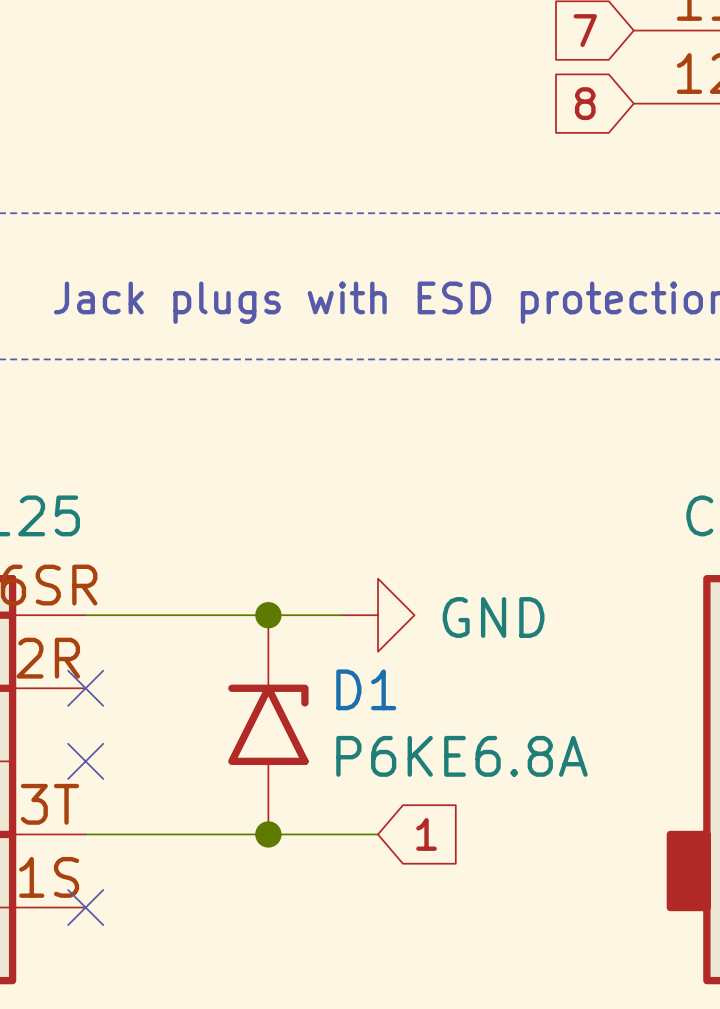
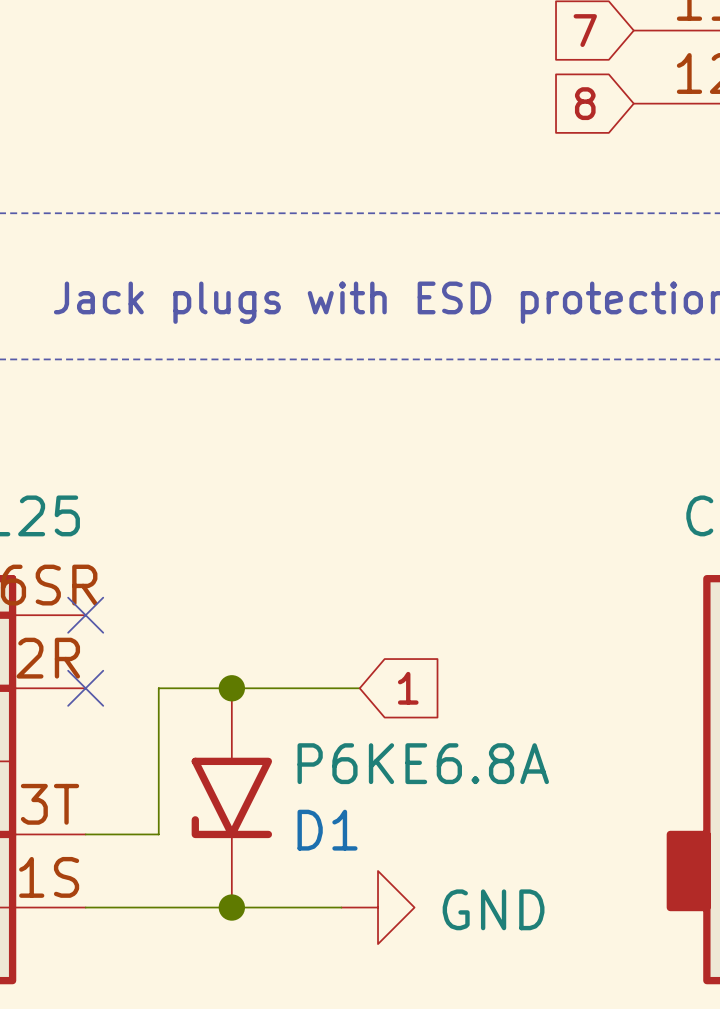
wire: (85, 615) (341, 615) -> (85, 907) (341, 907)
no-connect mark: none -> (85, 615)
junction: (268, 615) -> none
power symbol position: GND (378, 615) -> GND (378, 907)
junction: none -> (231, 688)
D1 name position: D1 (366, 689) -> D1 (327, 830)
D1 rotation: 0° (268, 724) -> 180° (231, 797)
D1 value position: P6KE6.8A (461, 756) -> P6KE6.8A (423, 763)
no-connect mark: (85, 761) -> none
wire: (158, 834) (378, 834) -> (158, 834) (158, 688) (359, 688)
junction: (268, 834) -> none
global label position: 1 (426, 834) -> 1 (408, 688)
no-connect mark: (85, 907) -> none
junction: none -> (231, 907)

